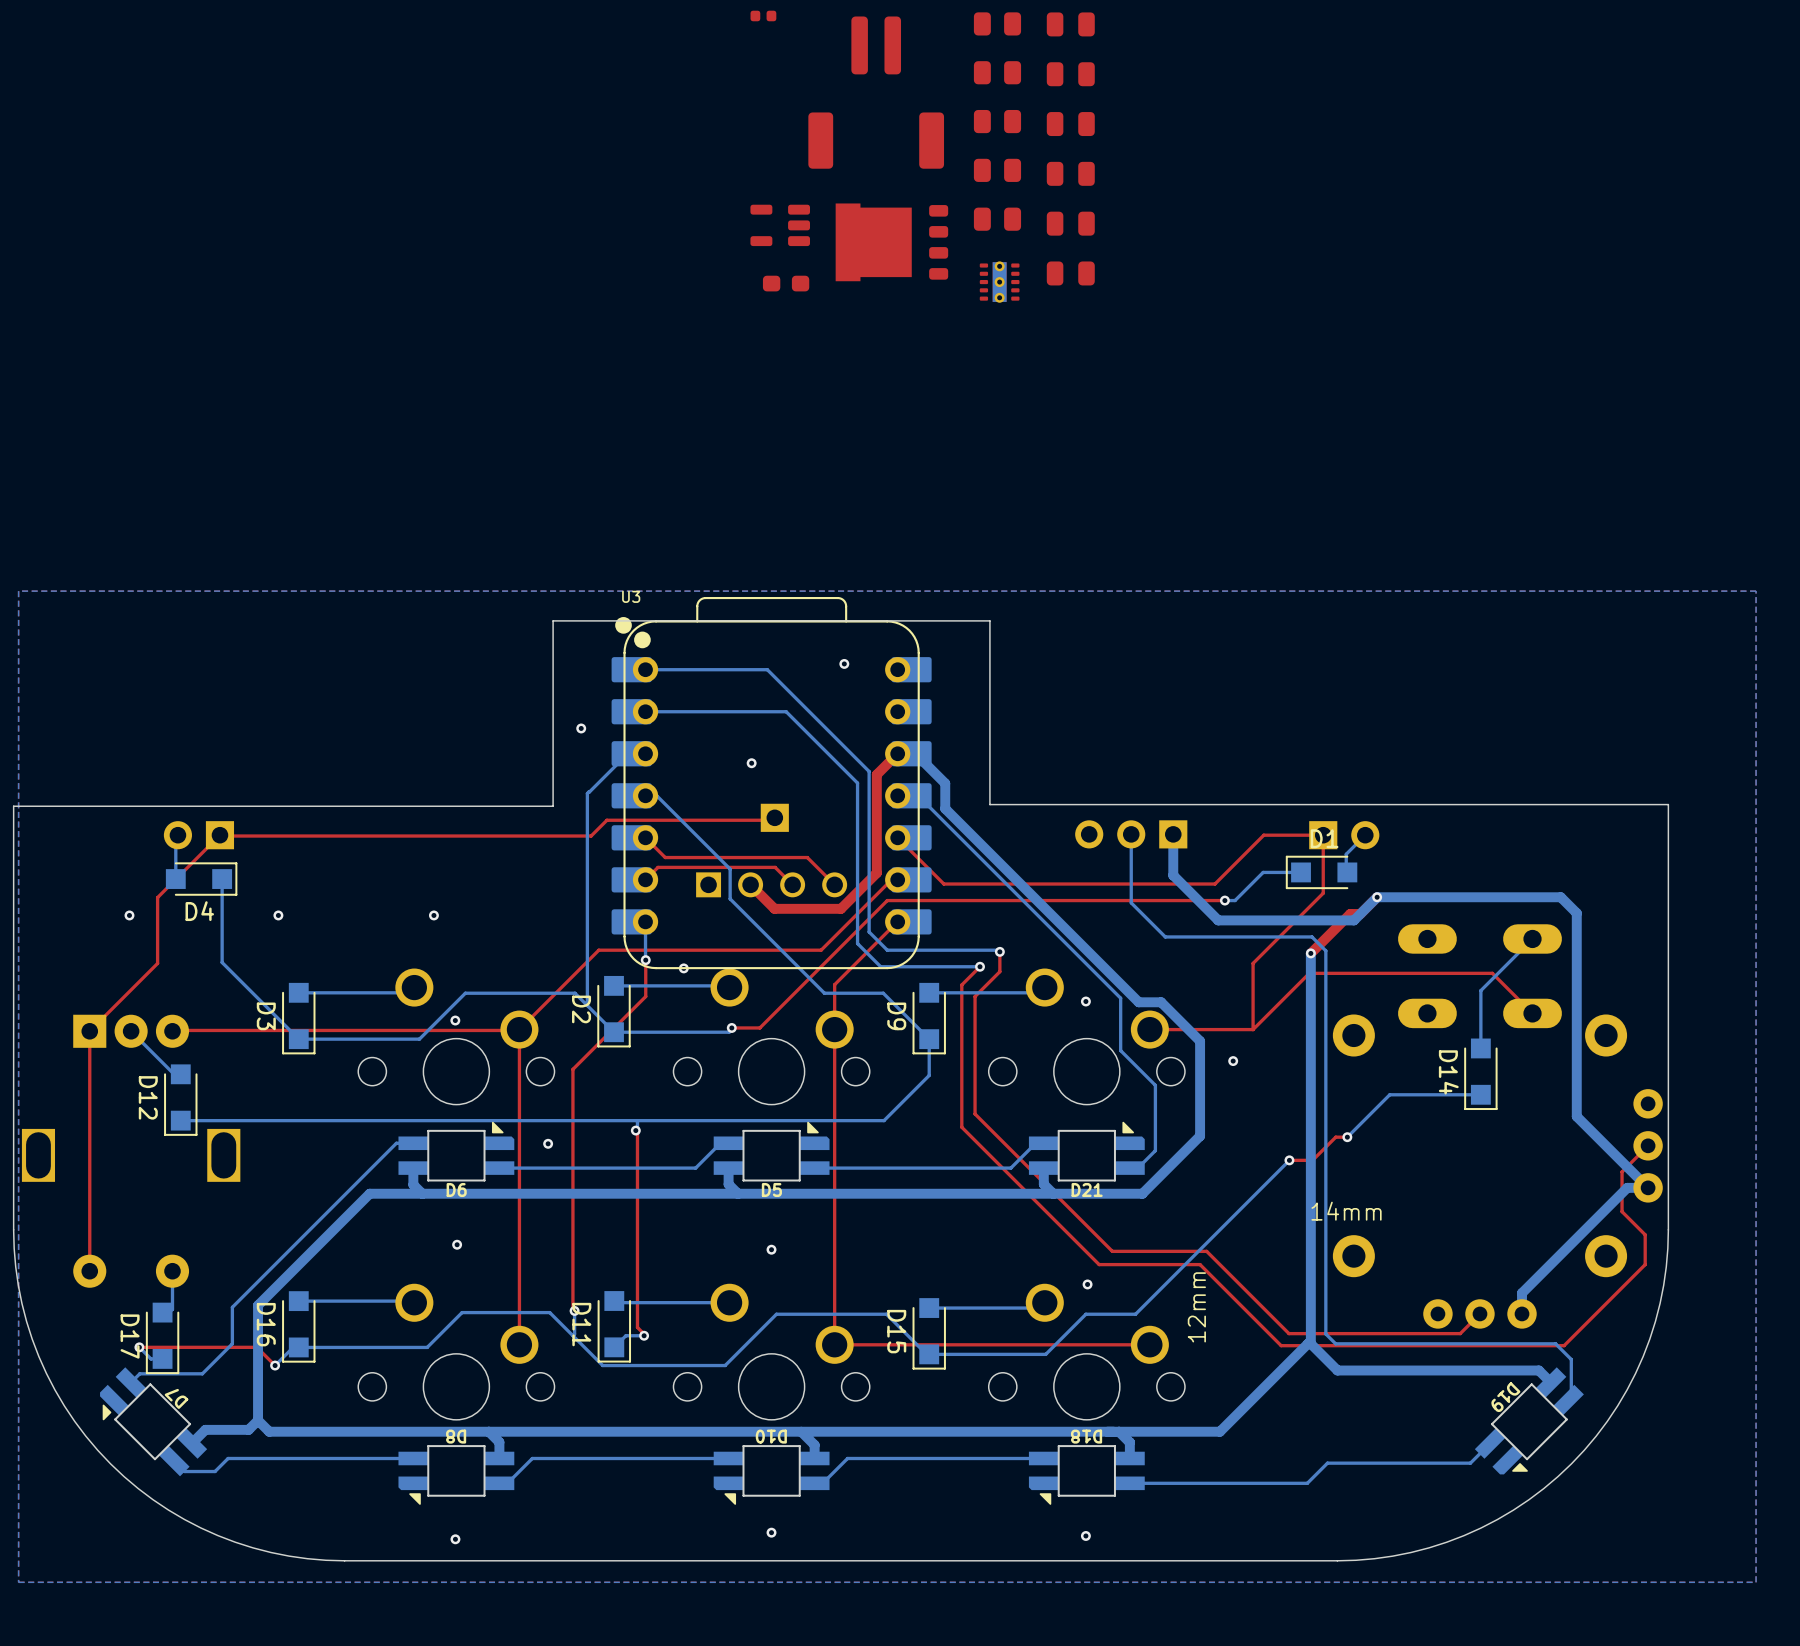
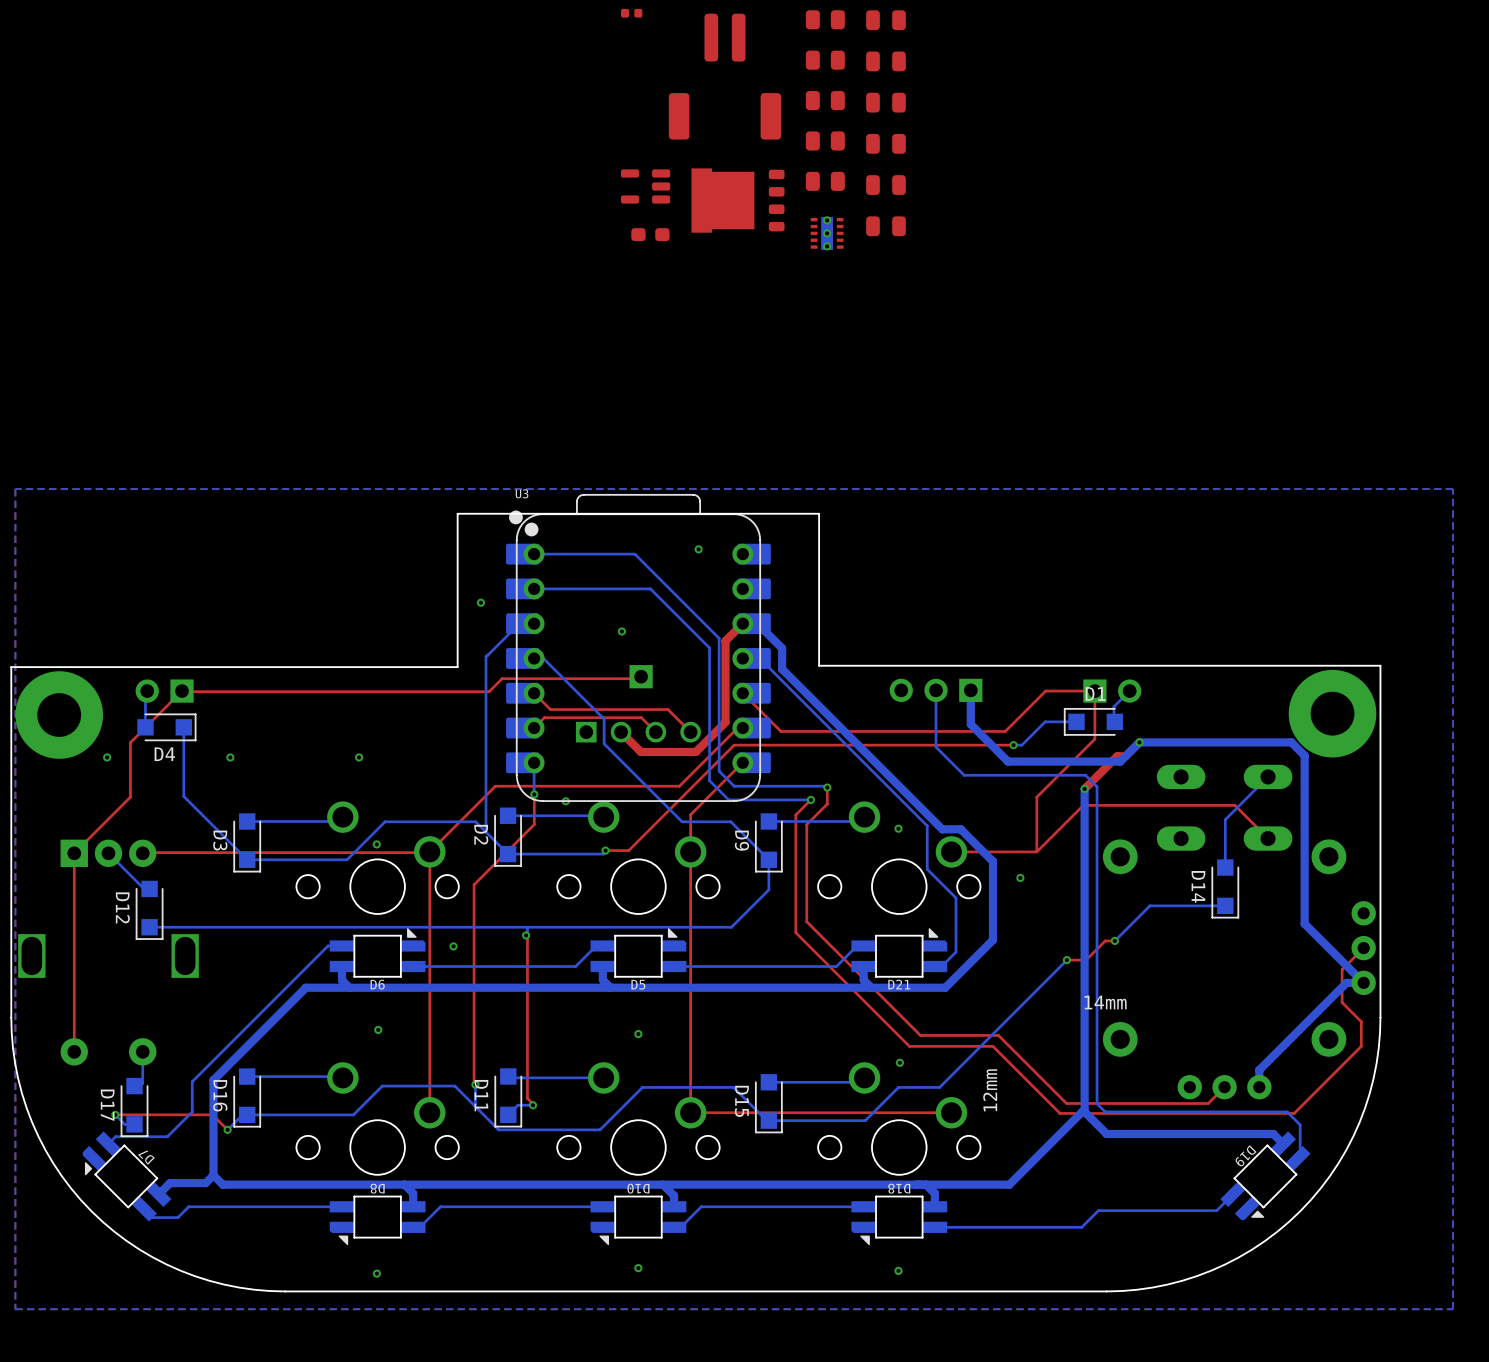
part: none -> (1332, 713)
part: none -> (59, 715)

